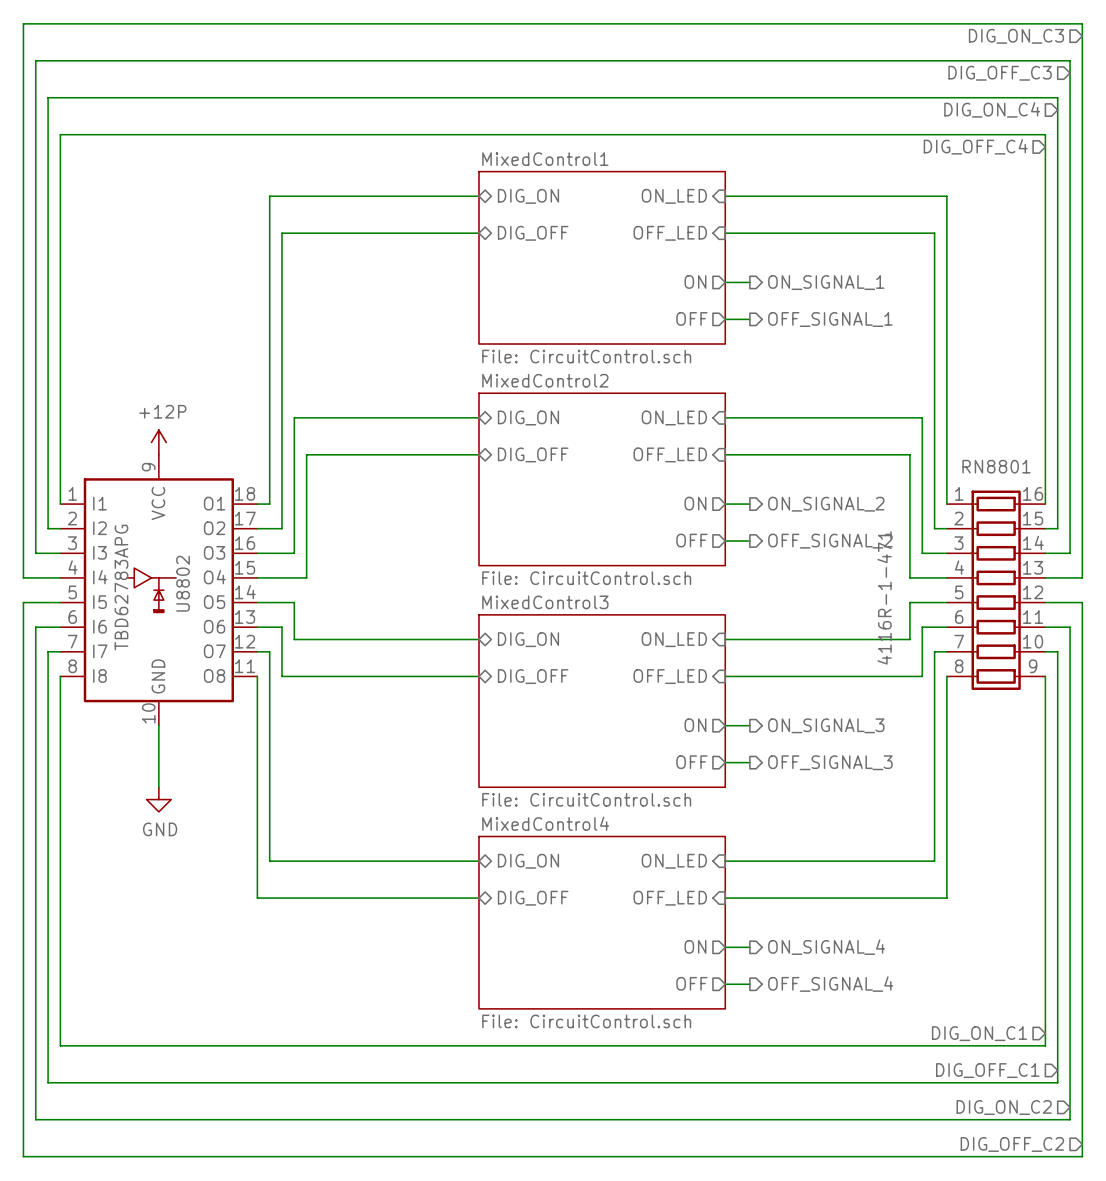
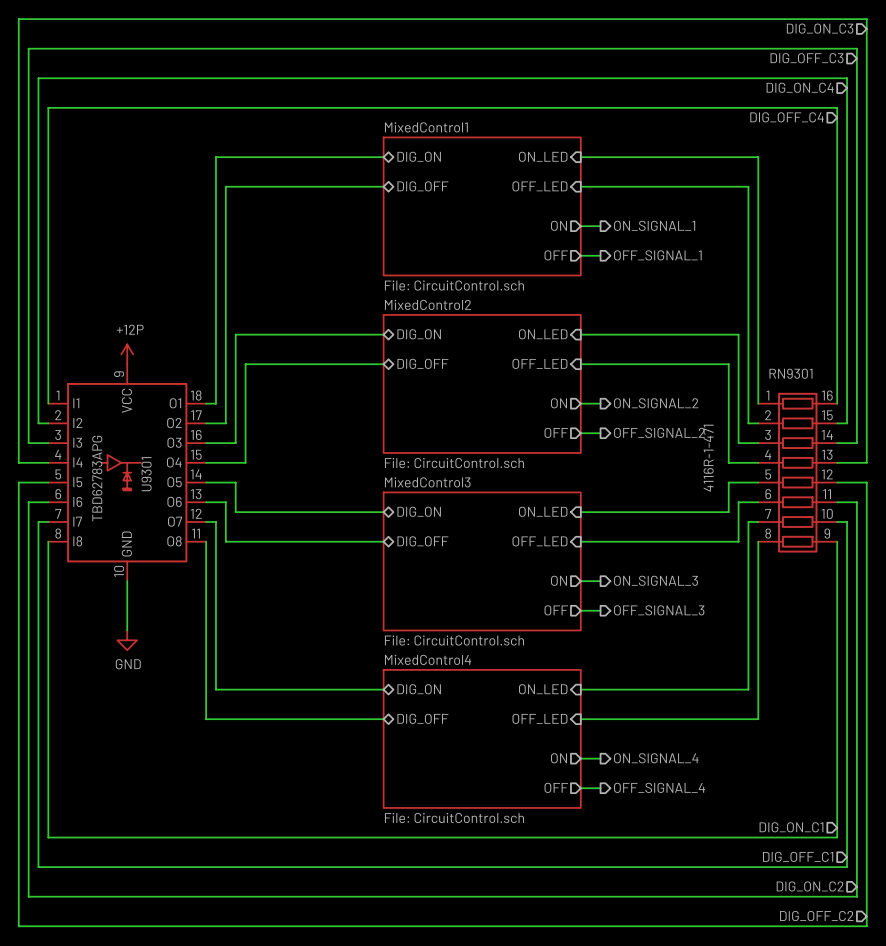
RN8801 name: RN8801 (996, 466) -> RN9301 (790, 373)
U8802 name: U8802 (183, 583) -> U9301 (146, 474)

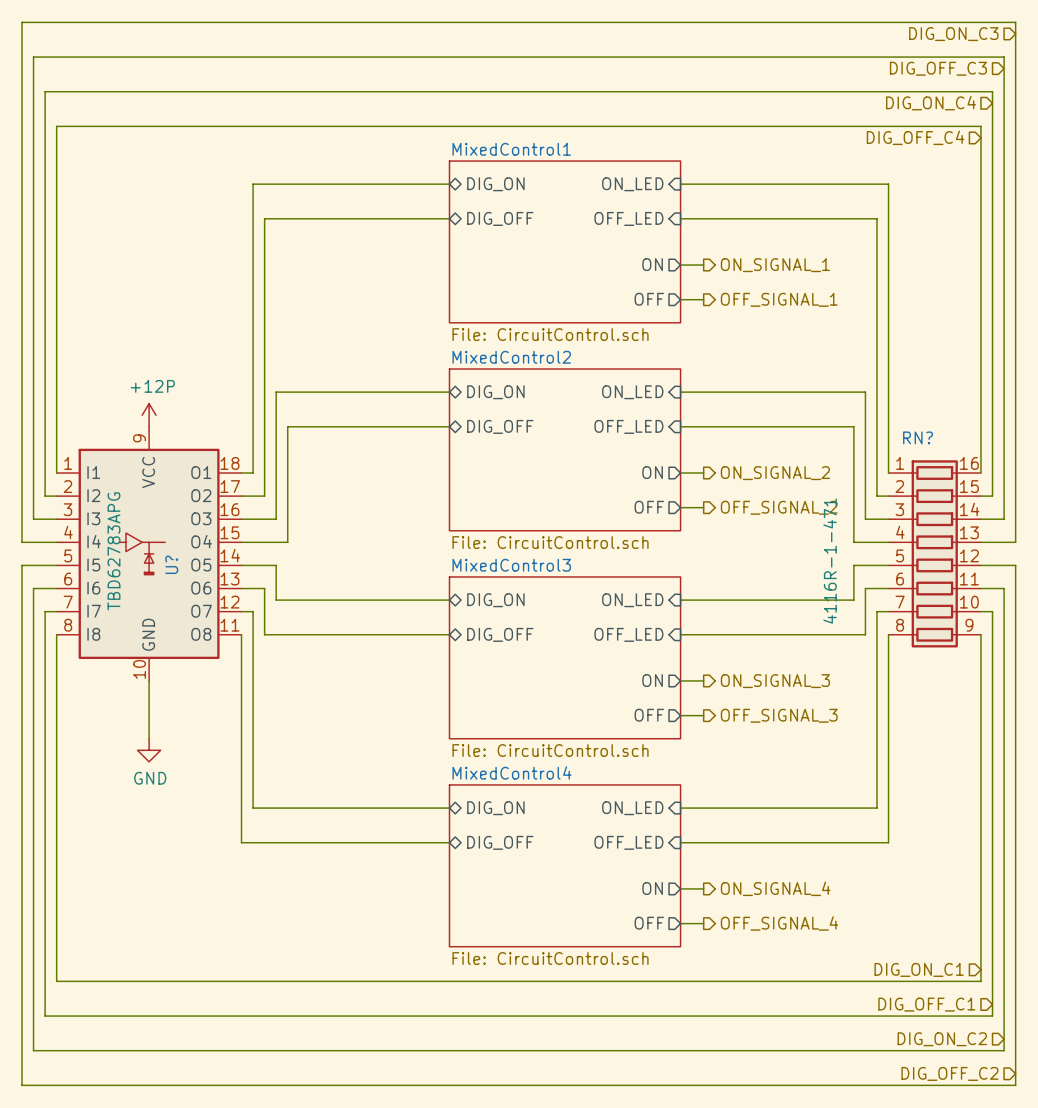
RN9301 name: RN9301 (790, 373) -> RN? (918, 437)
U9301 name: U9301 (146, 474) -> U? (171, 564)

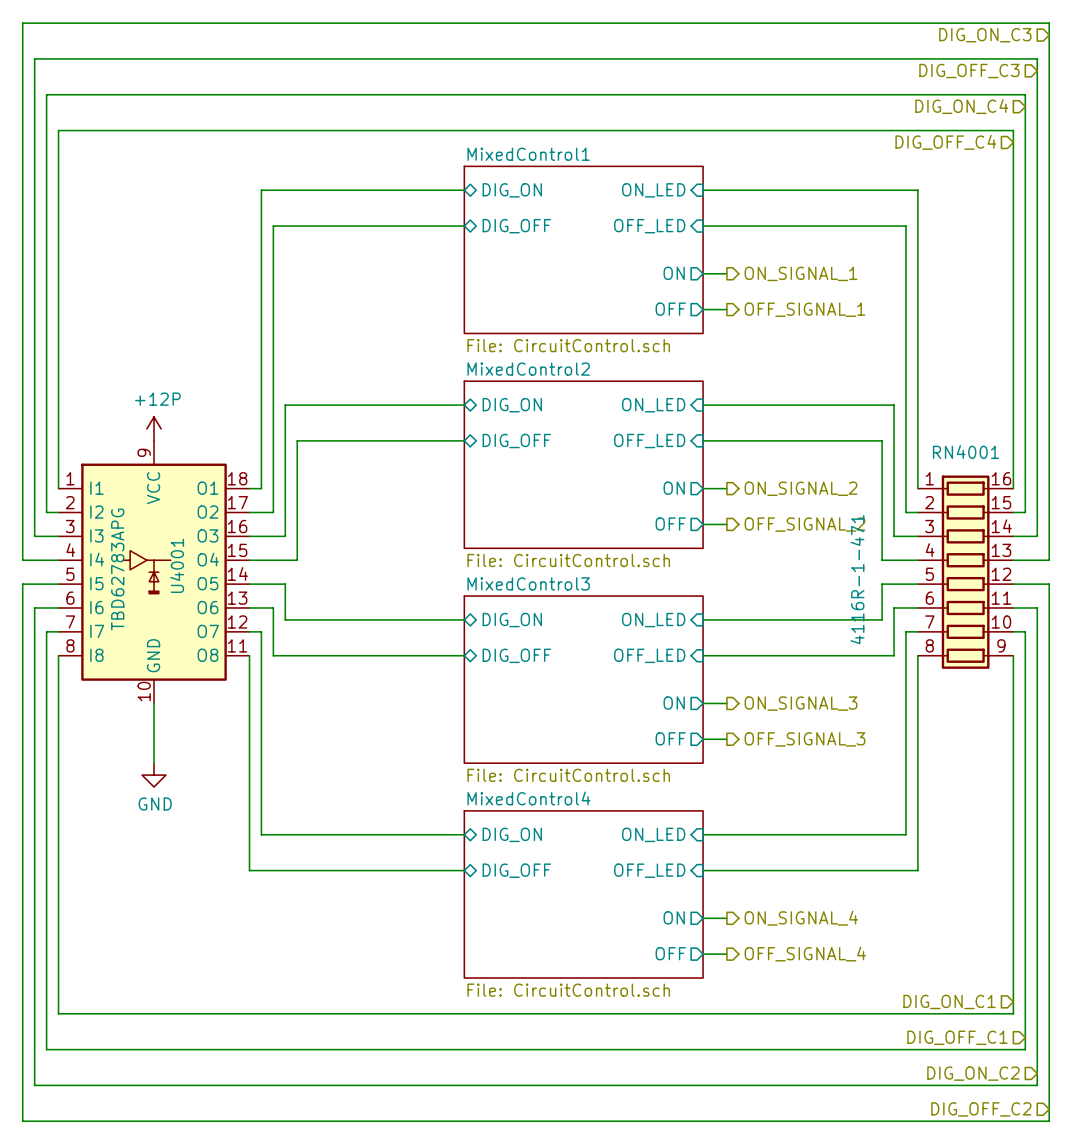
RN? name: RN? (918, 437) -> RN4001 (966, 452)
U? name: U? (171, 564) -> U4001 (177, 565)

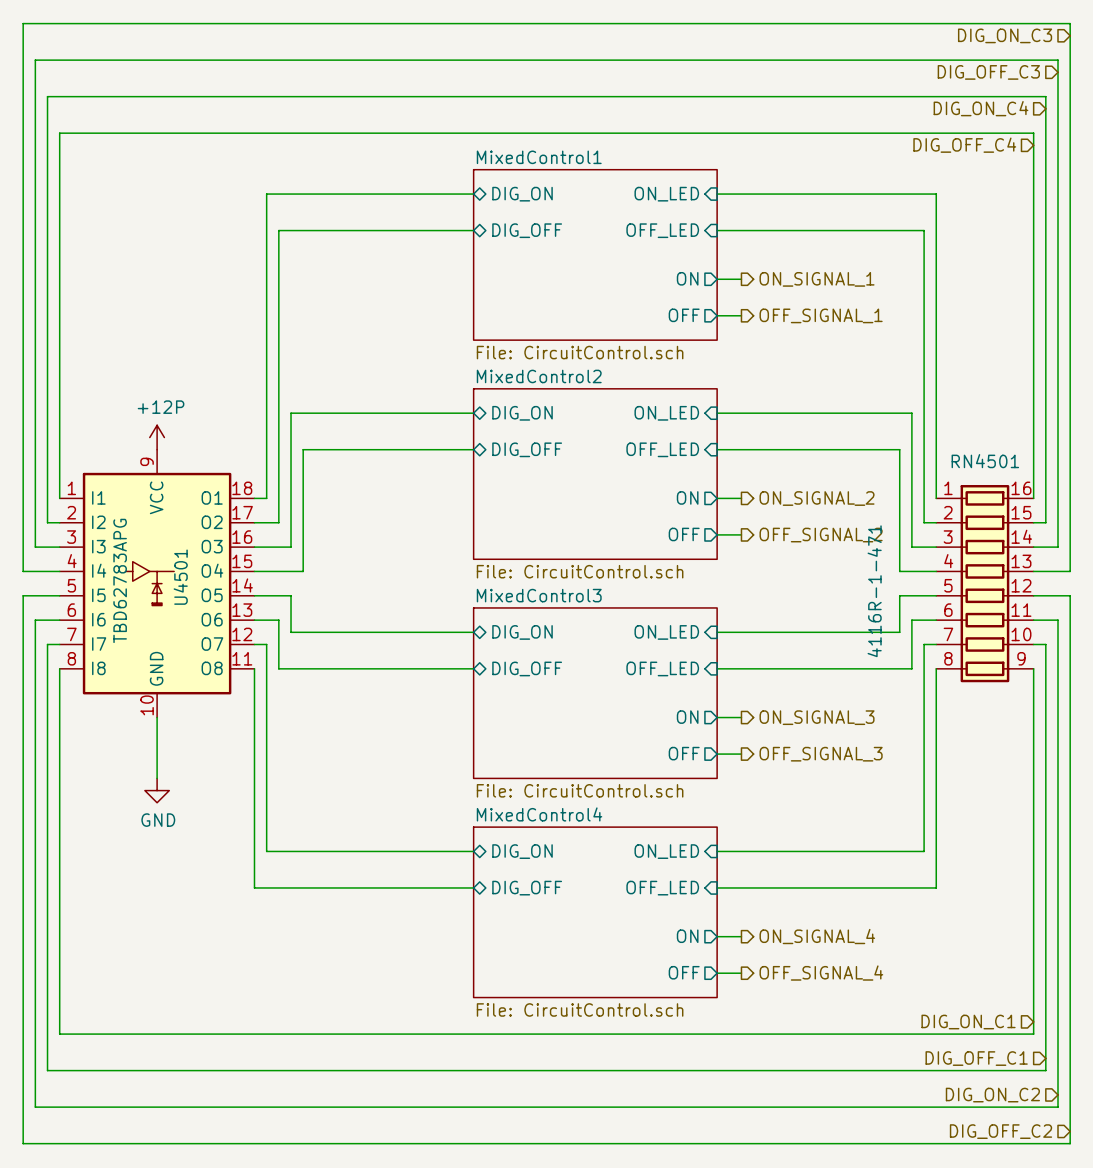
RN4001 name: RN4001 (966, 452) -> RN4501 (985, 461)
U4001 name: U4001 (177, 565) -> U4501 (180, 577)

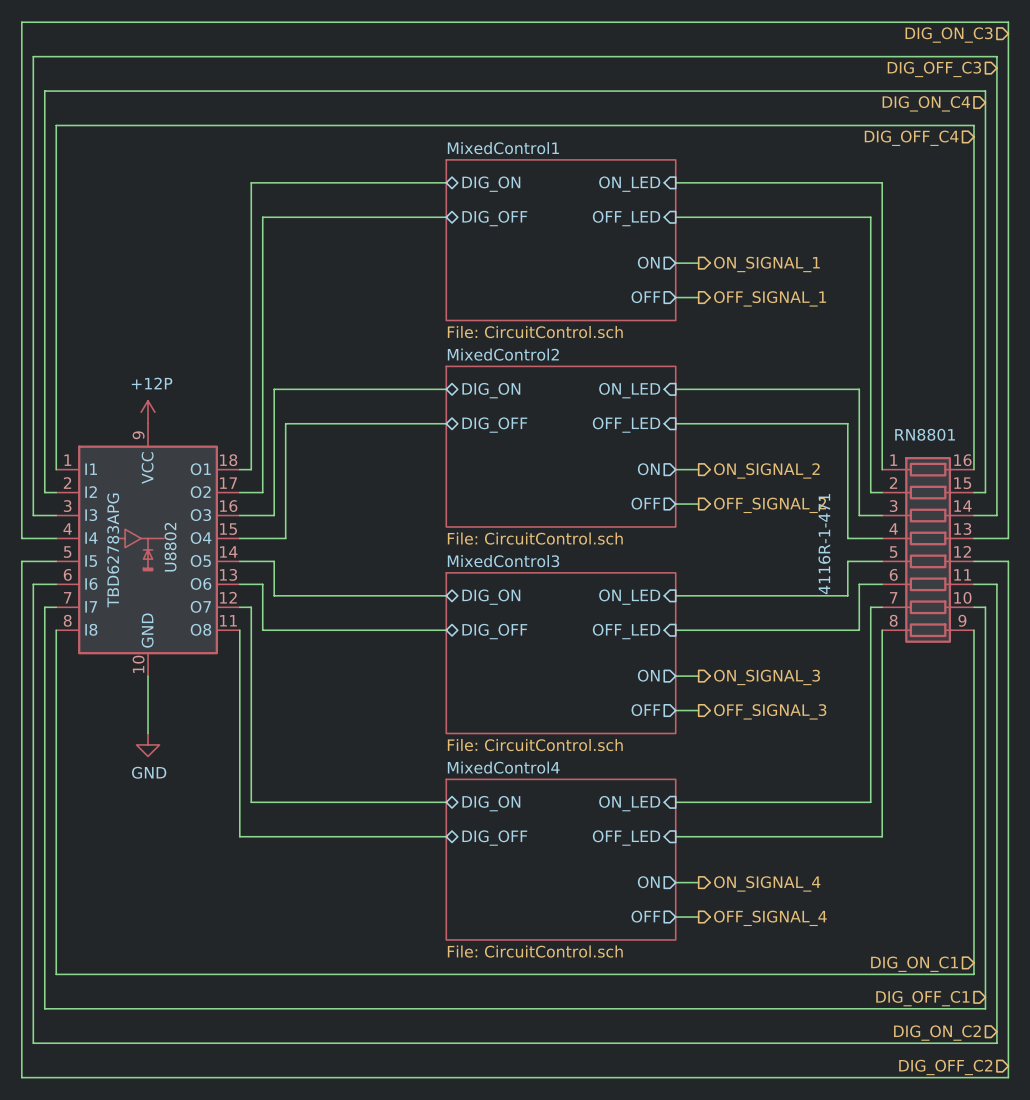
RN4501 name: RN4501 (985, 461) -> RN8801 (925, 434)
U4501 name: U4501 (180, 577) -> U8802 (170, 547)

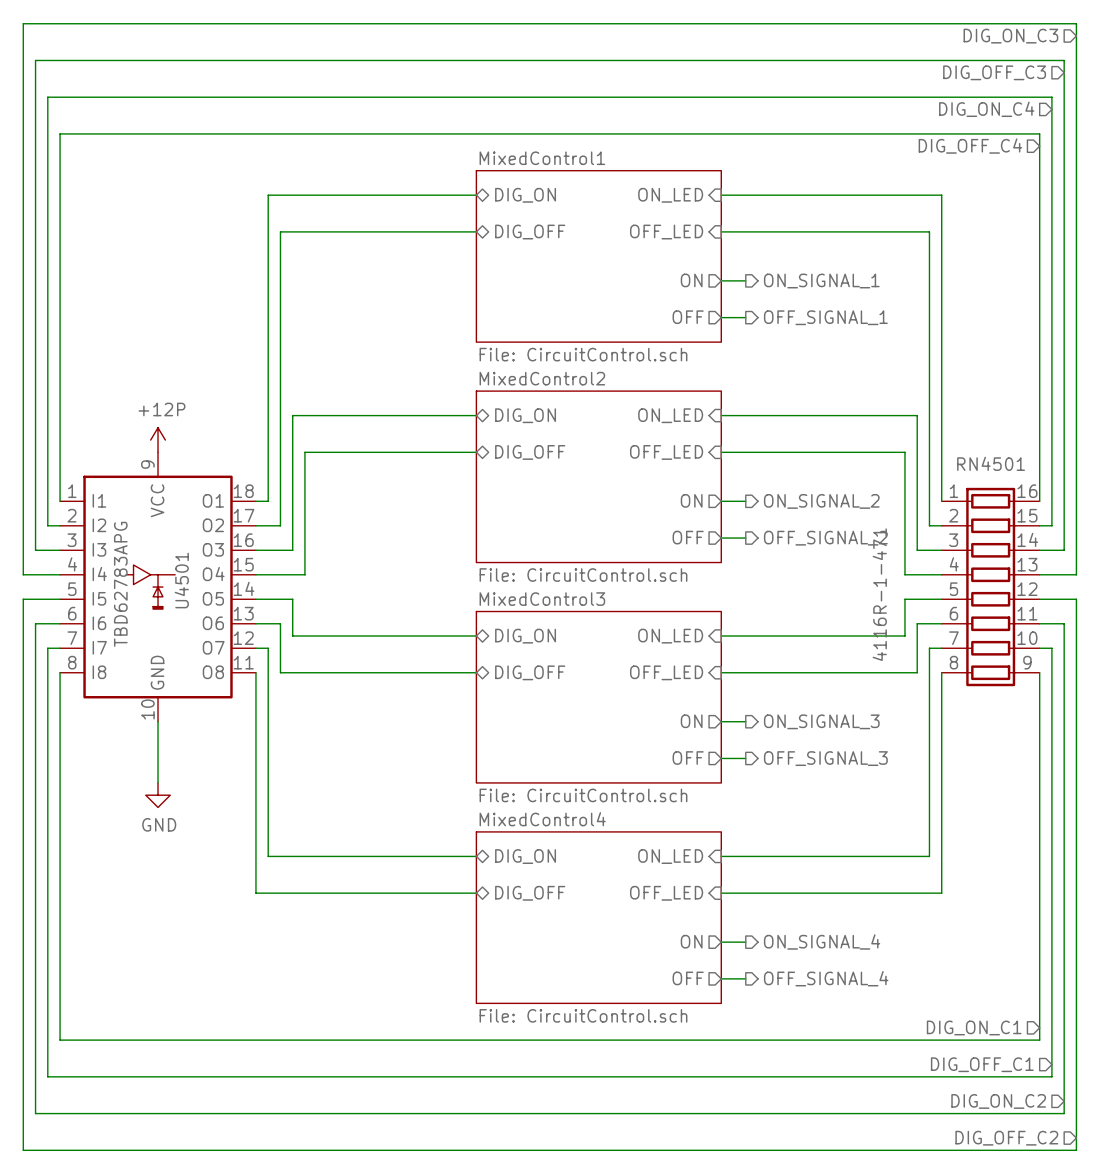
RN8801 name: RN8801 (925, 434) -> RN4501 (991, 463)
U8802 name: U8802 (170, 547) -> U4501 (181, 580)

